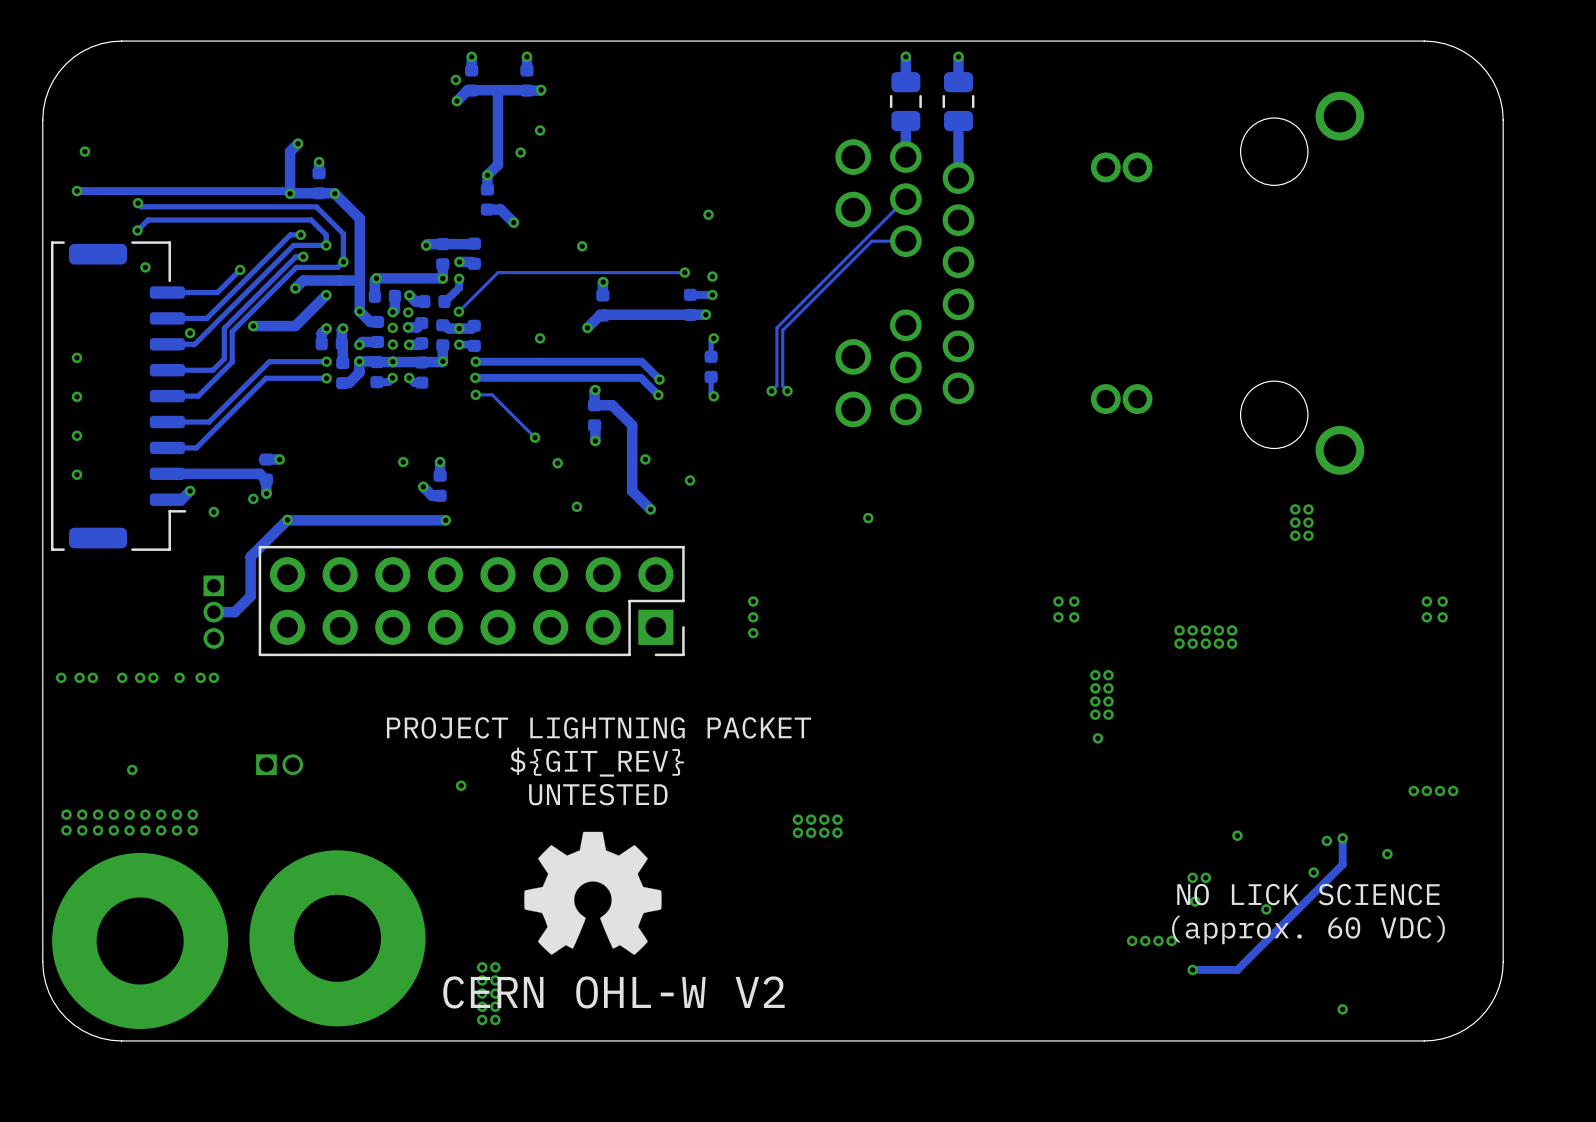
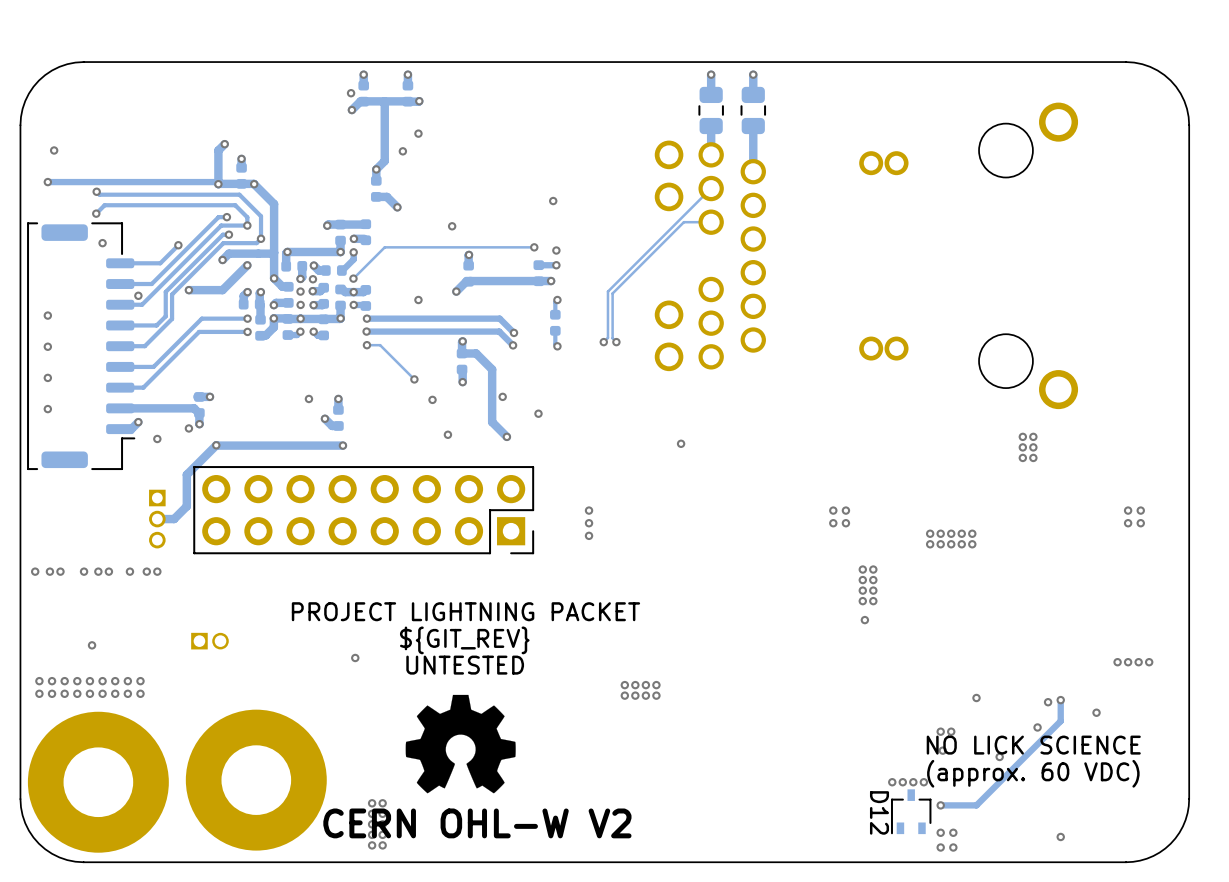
D12: none -> (911, 811)
via: none -> (940, 832)
via: none -> (953, 832)
via: none -> (940, 847)
via: none -> (953, 847)

